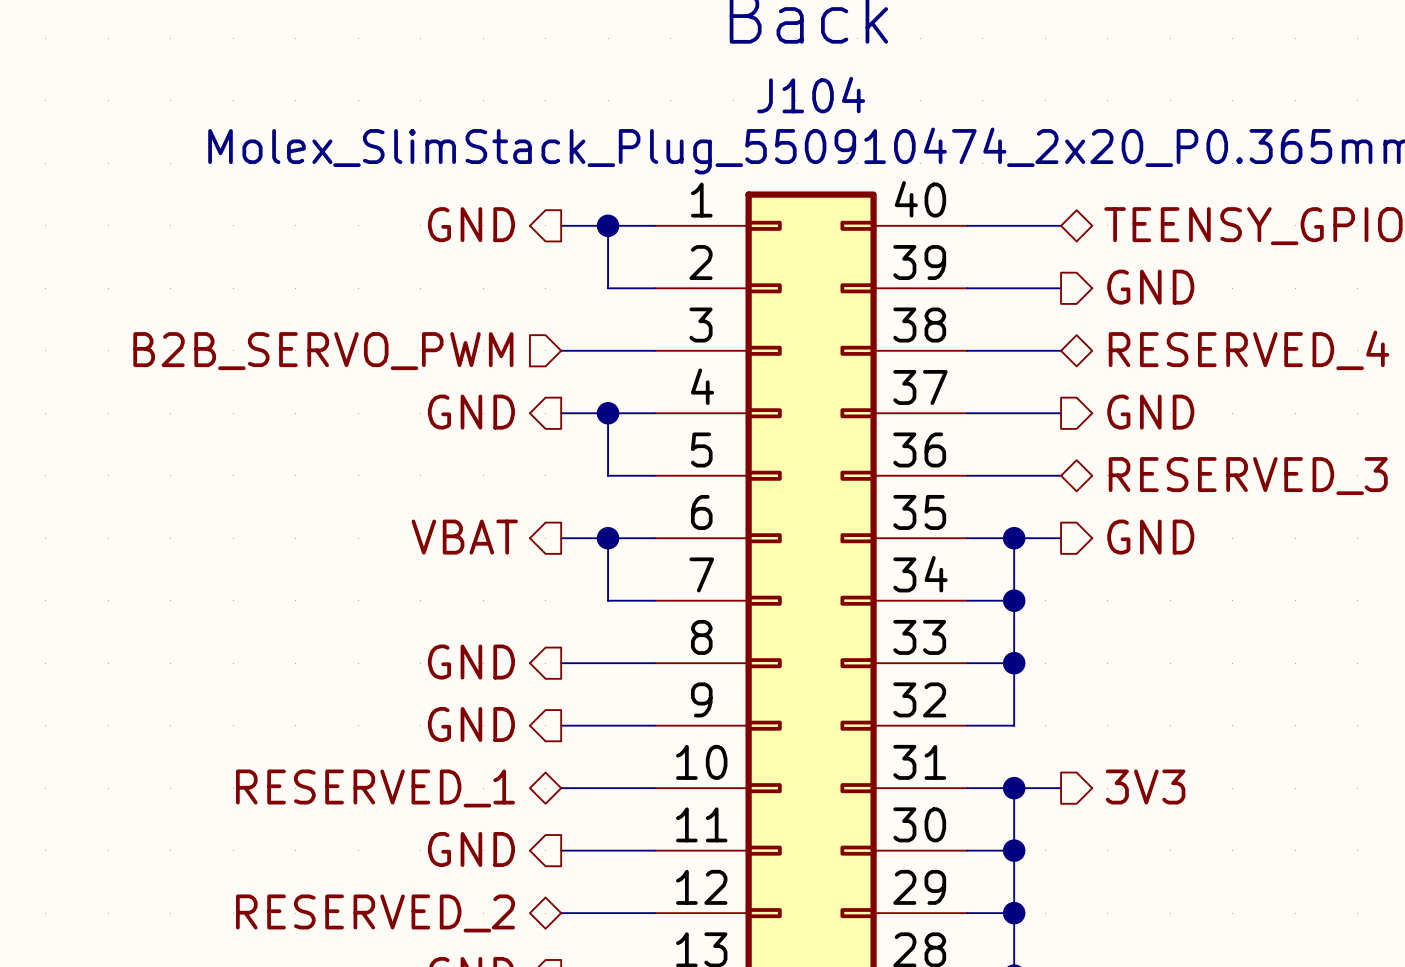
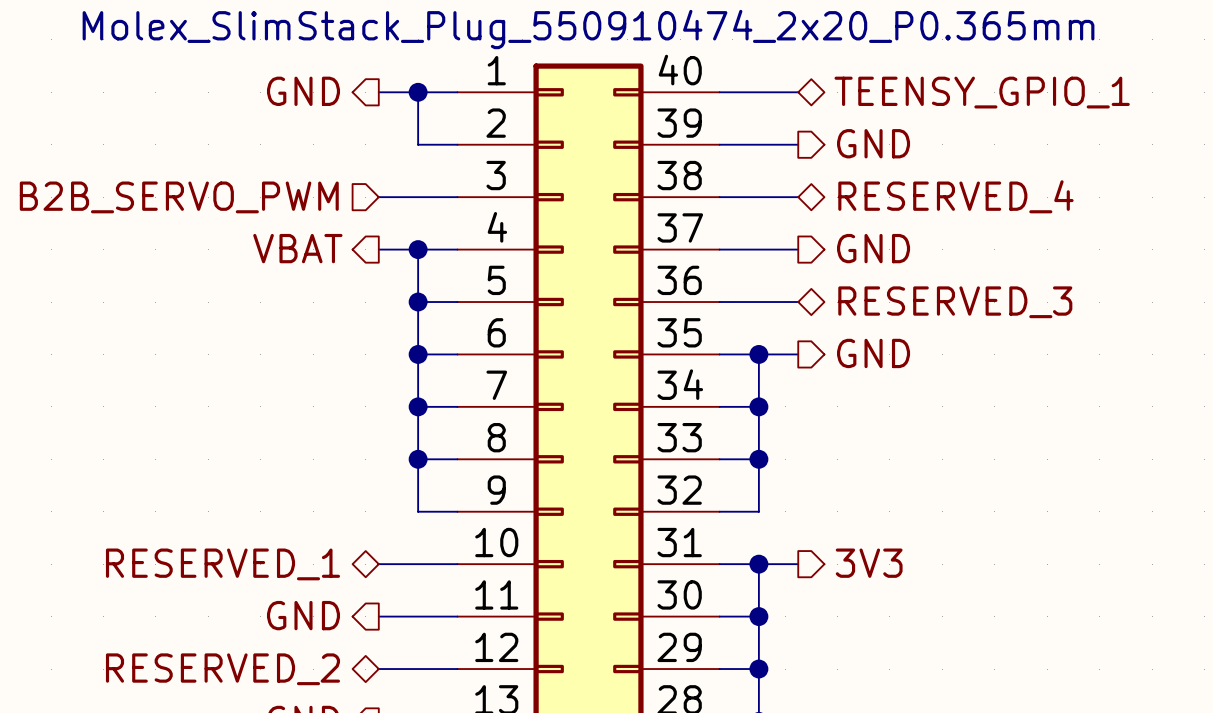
hierarchical label: GND (471, 412) -> VBAT (297, 248)
junction: none -> (418, 302)
hierarchical label: VBAT (464, 537) -> none
wire: (561, 538) (608, 538) -> (418, 302) (418, 354)
junction: none -> (418, 406)
hierarchical label: GND (471, 662) -> none
wire: (561, 663) (608, 663) -> none
junction: none -> (418, 459)
hierarchical label: GND (471, 724) -> none
wire: (561, 725) (608, 725) -> (418, 406) (418, 511)

